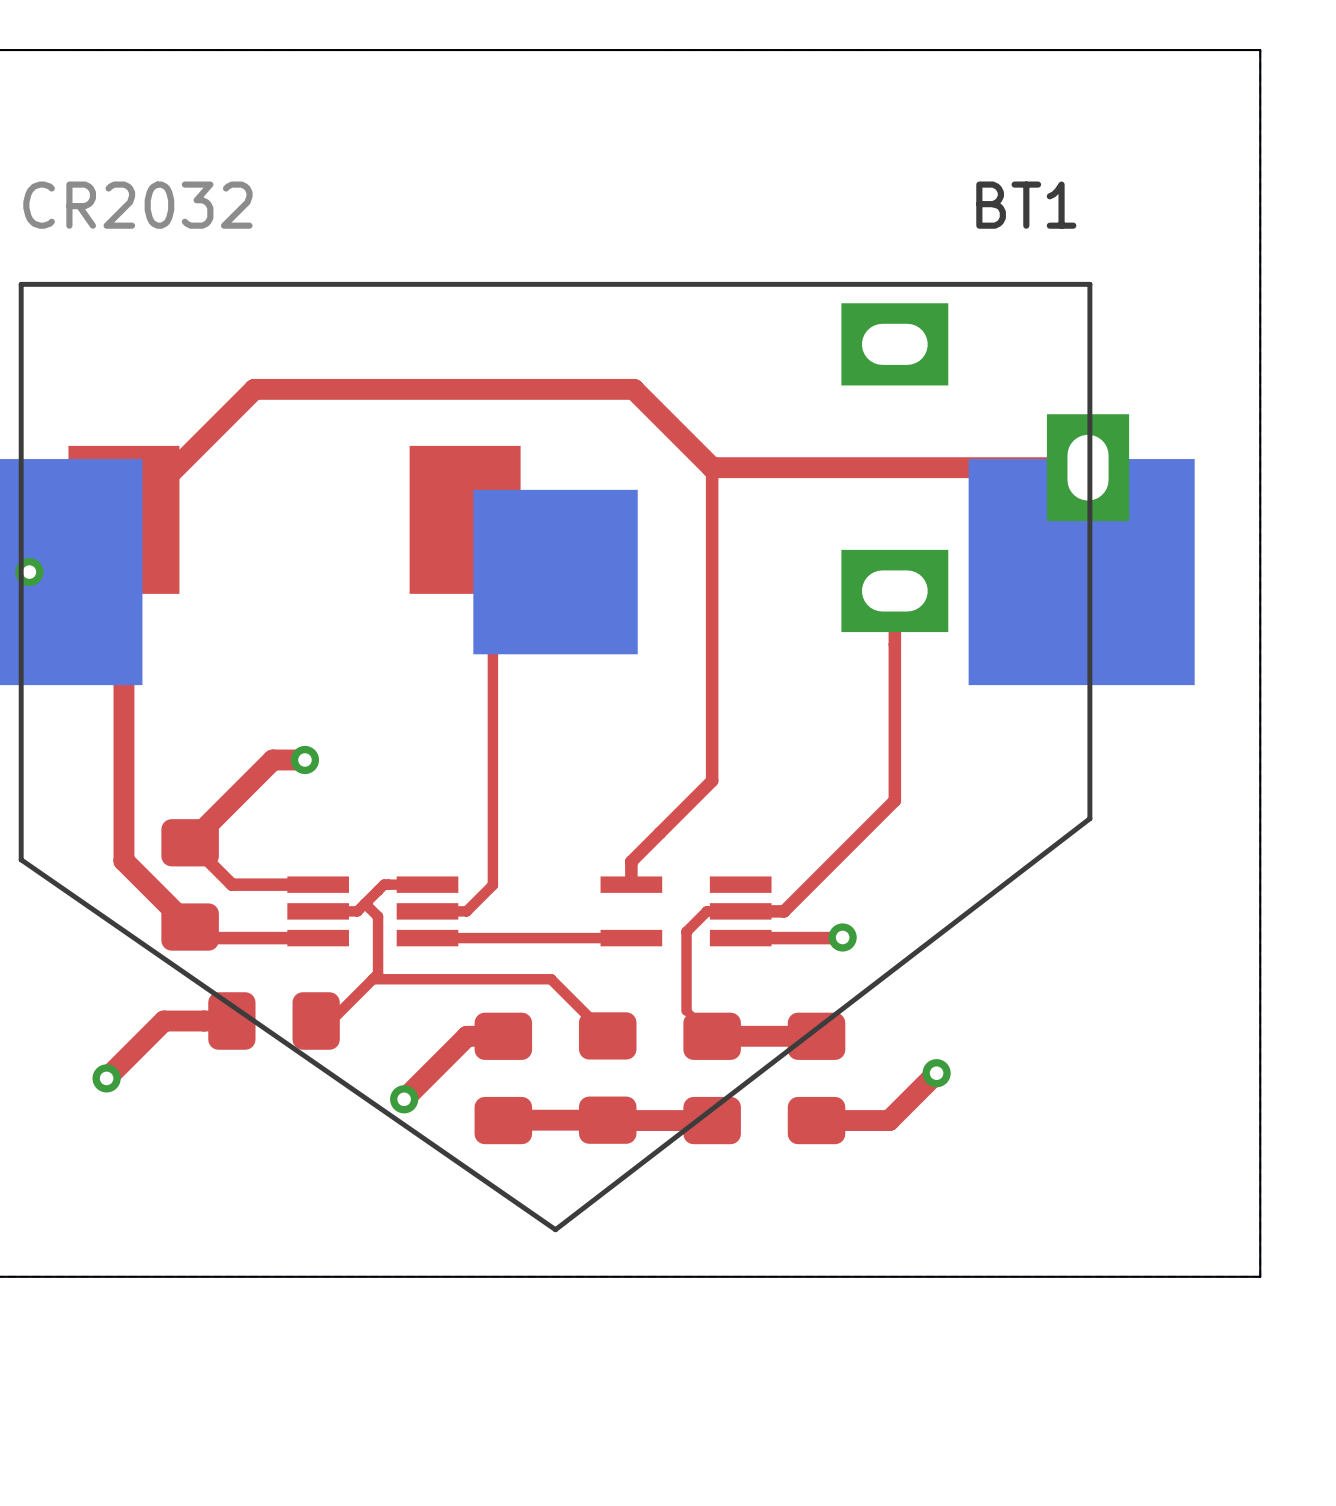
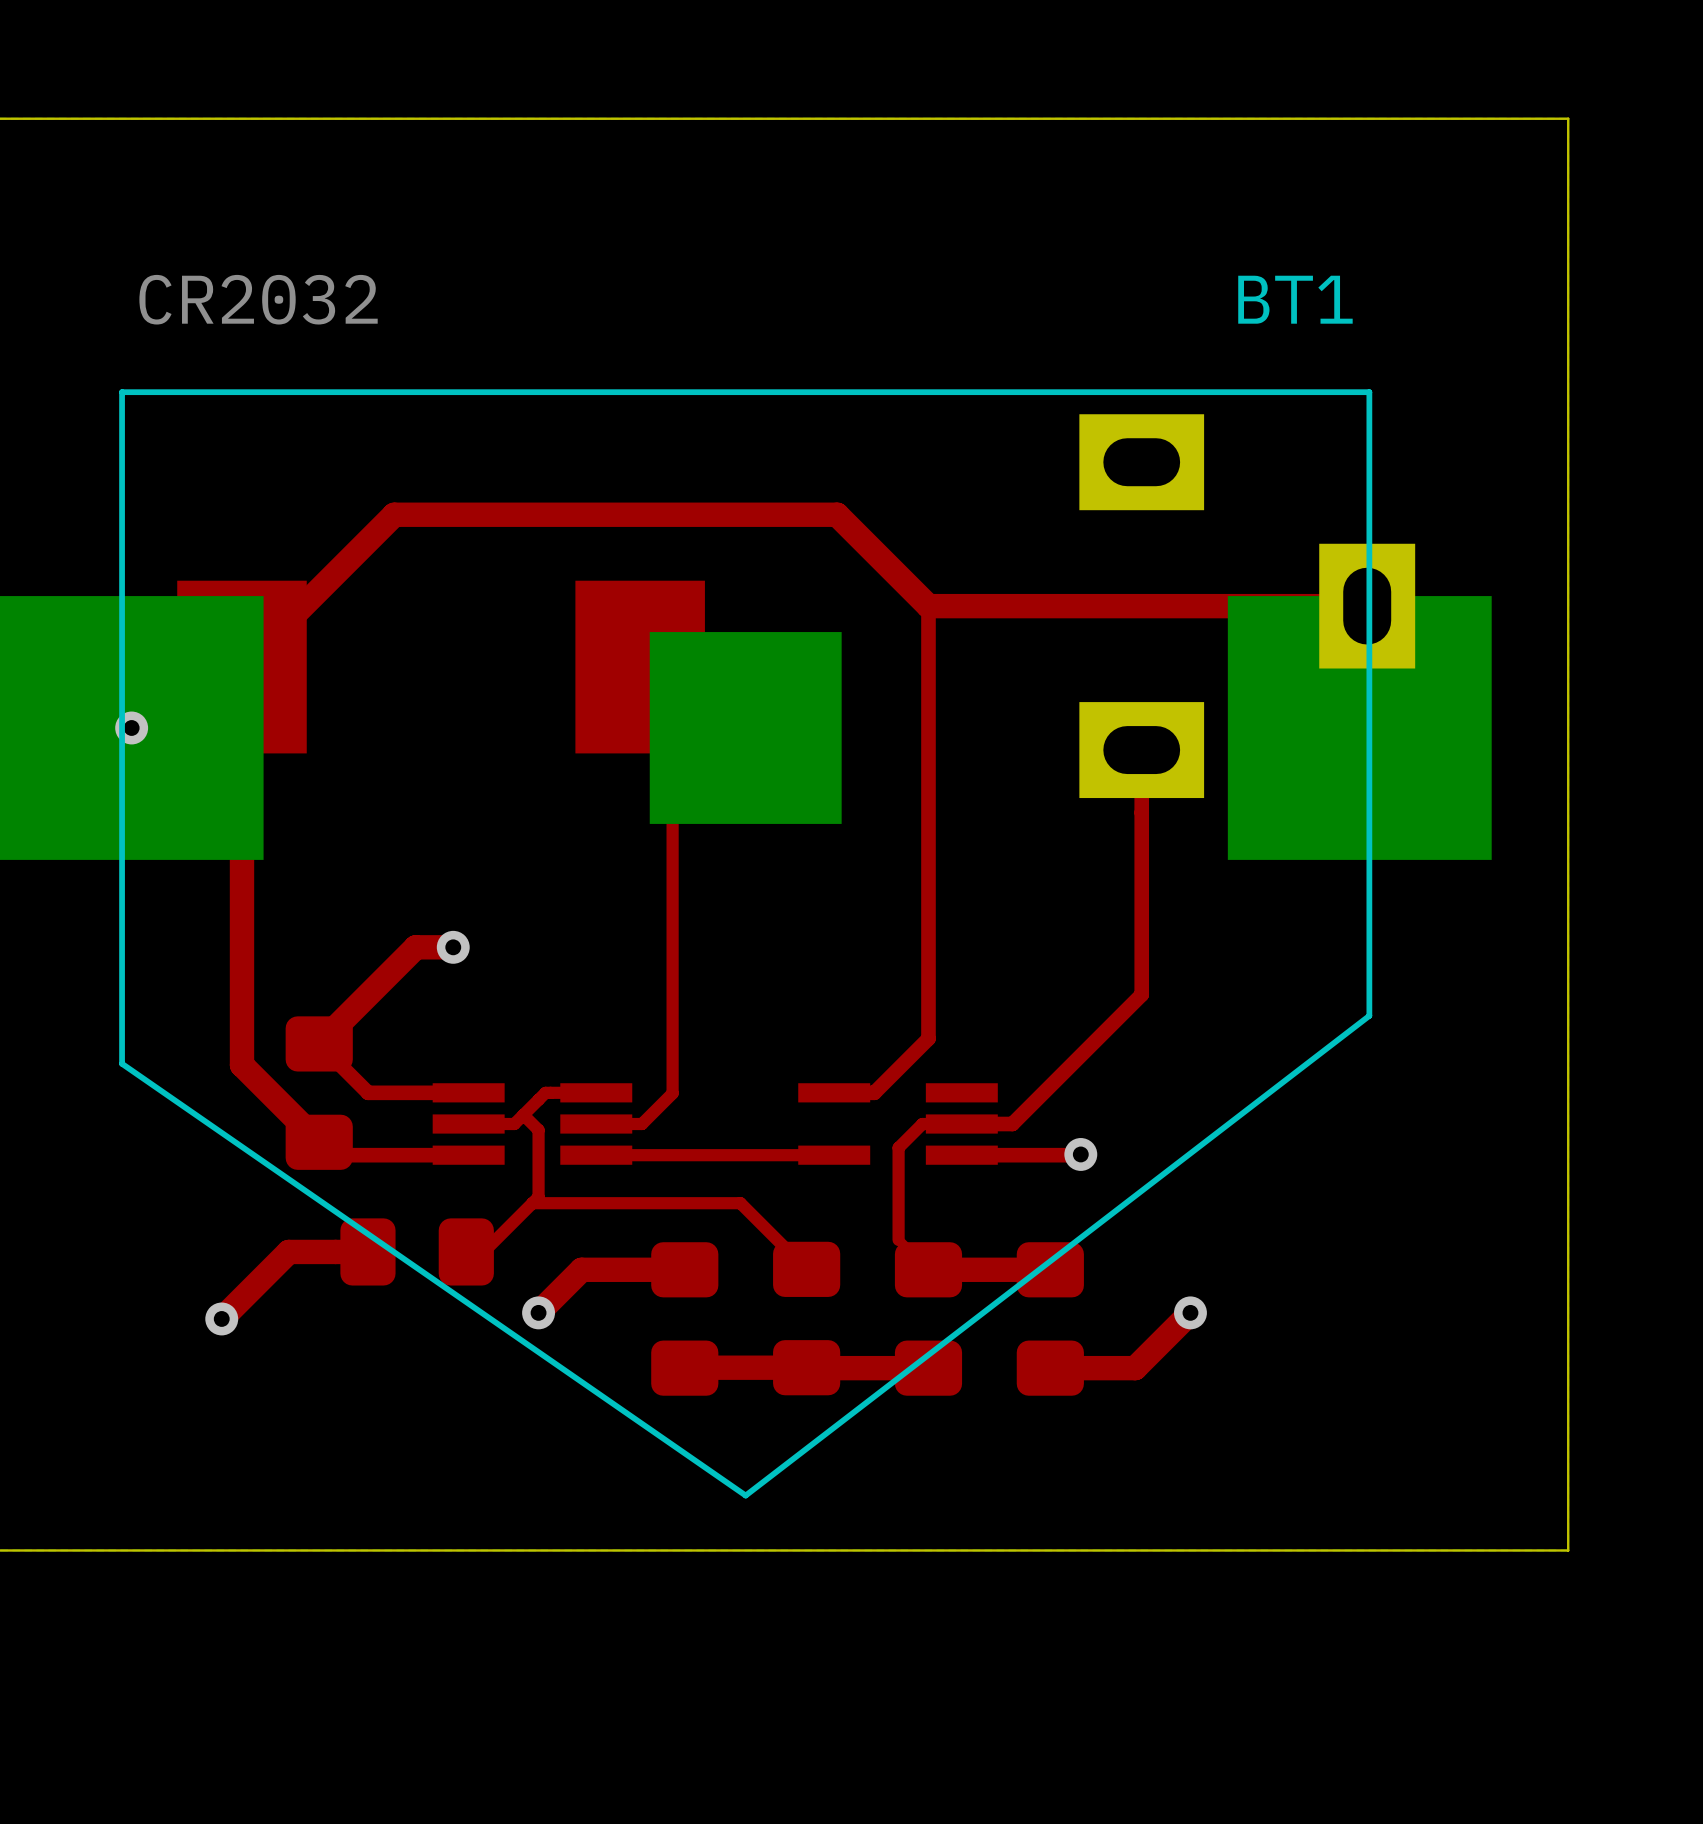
top track: (712, 780) (631, 861) (631, 884) -> (928, 971) (928, 1038) (874, 1092) (834, 1092)
top track: (467, 1036) (404, 1099) -> (642, 1269) (581, 1269) (538, 1312)
via position: (404, 1099) -> (538, 1312)

